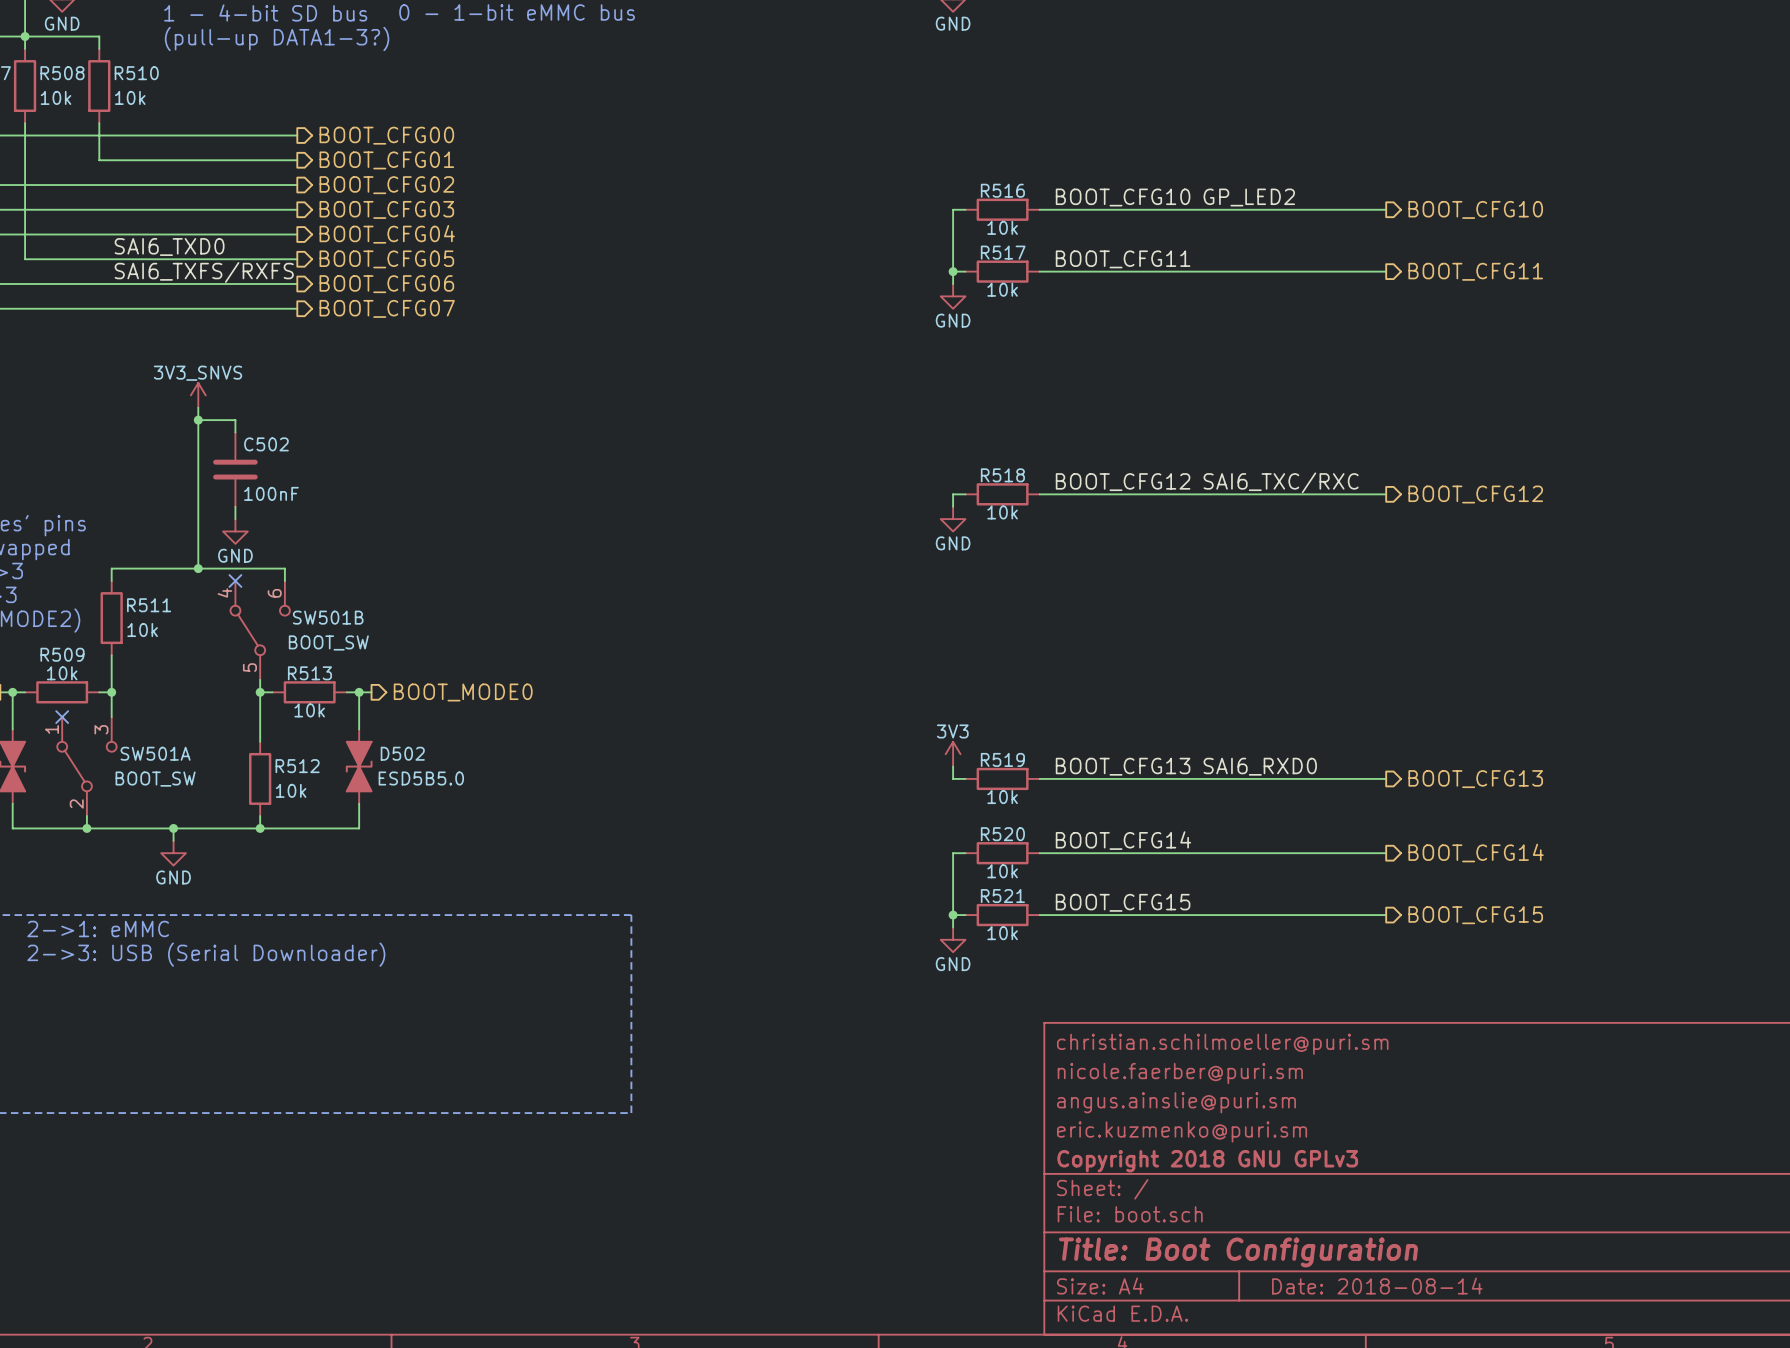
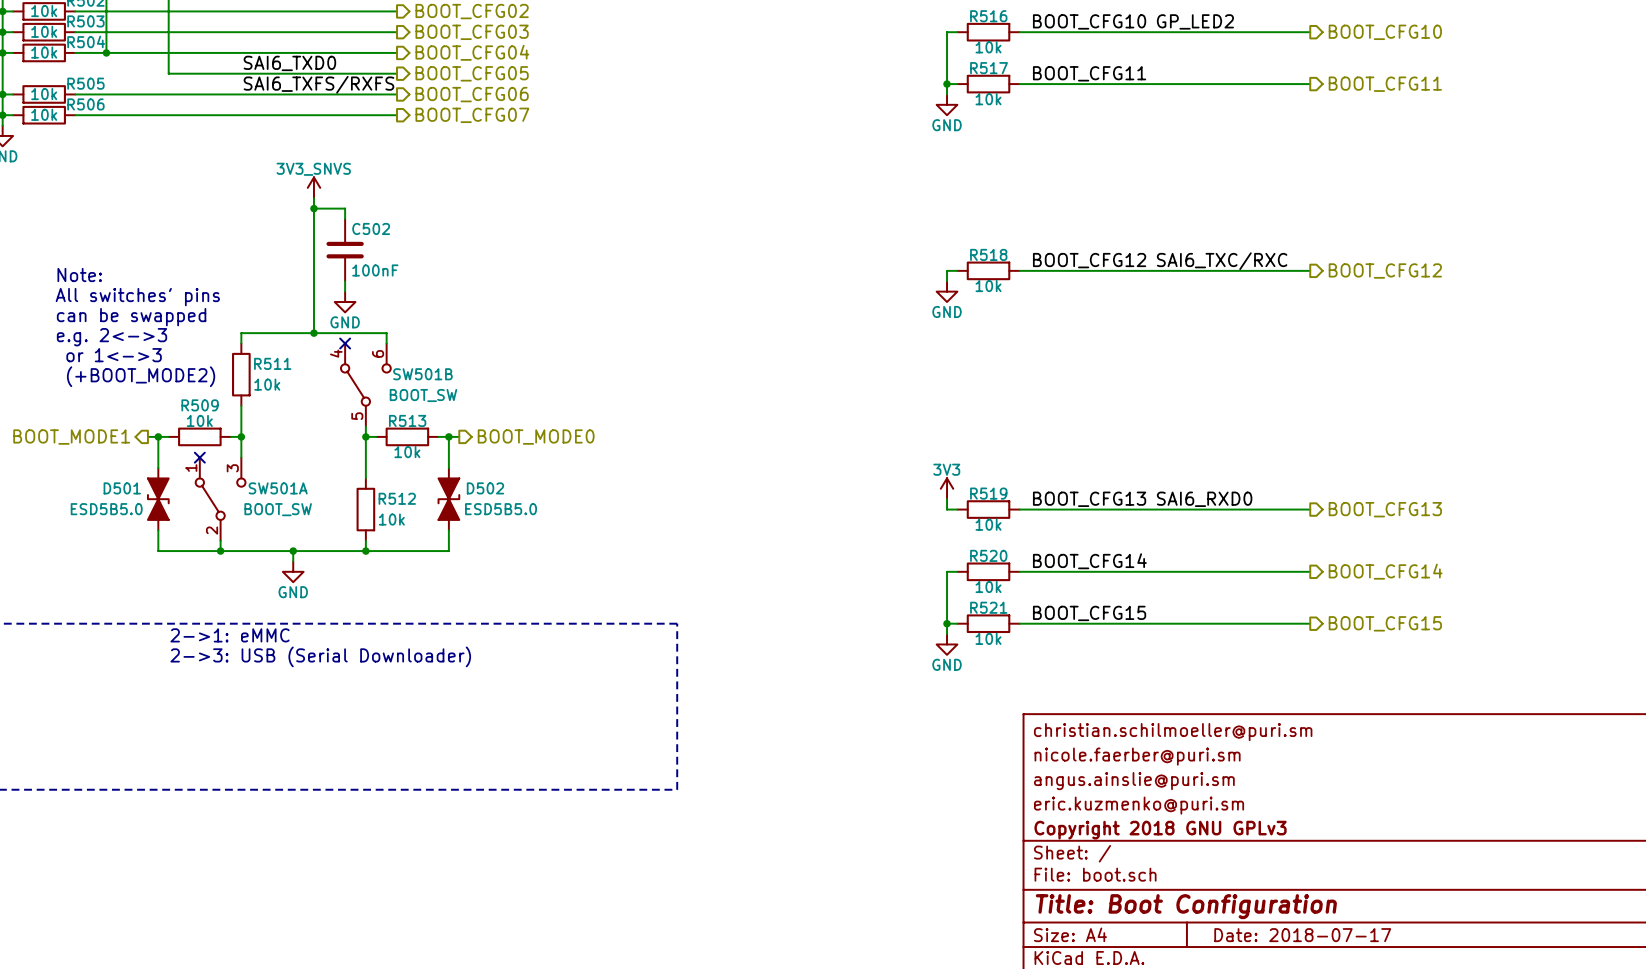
title block: Date: 2018-08-14 (1377, 1286) -> Date: 2018-07-17 (1302, 935)

